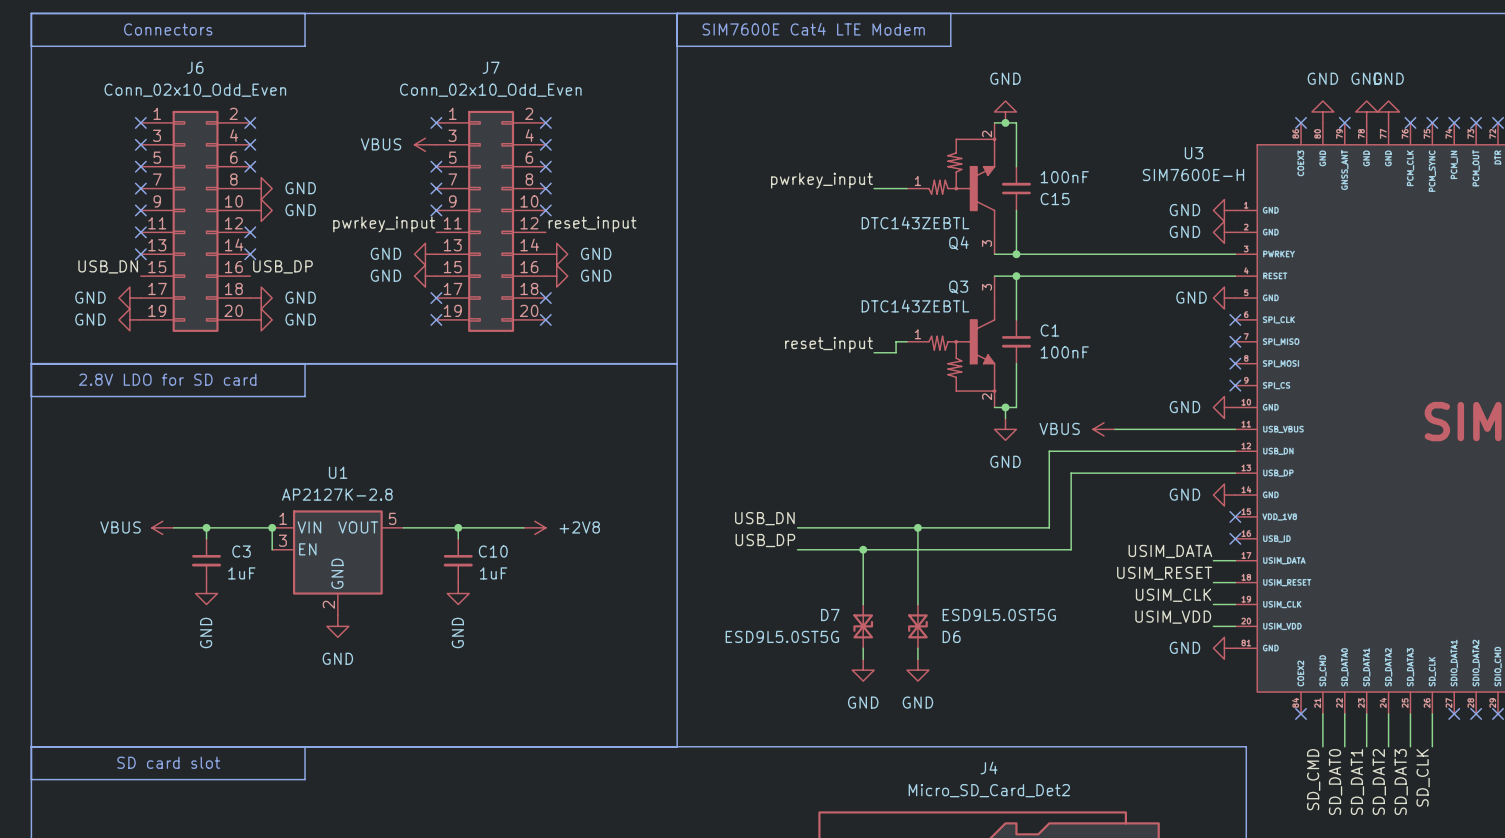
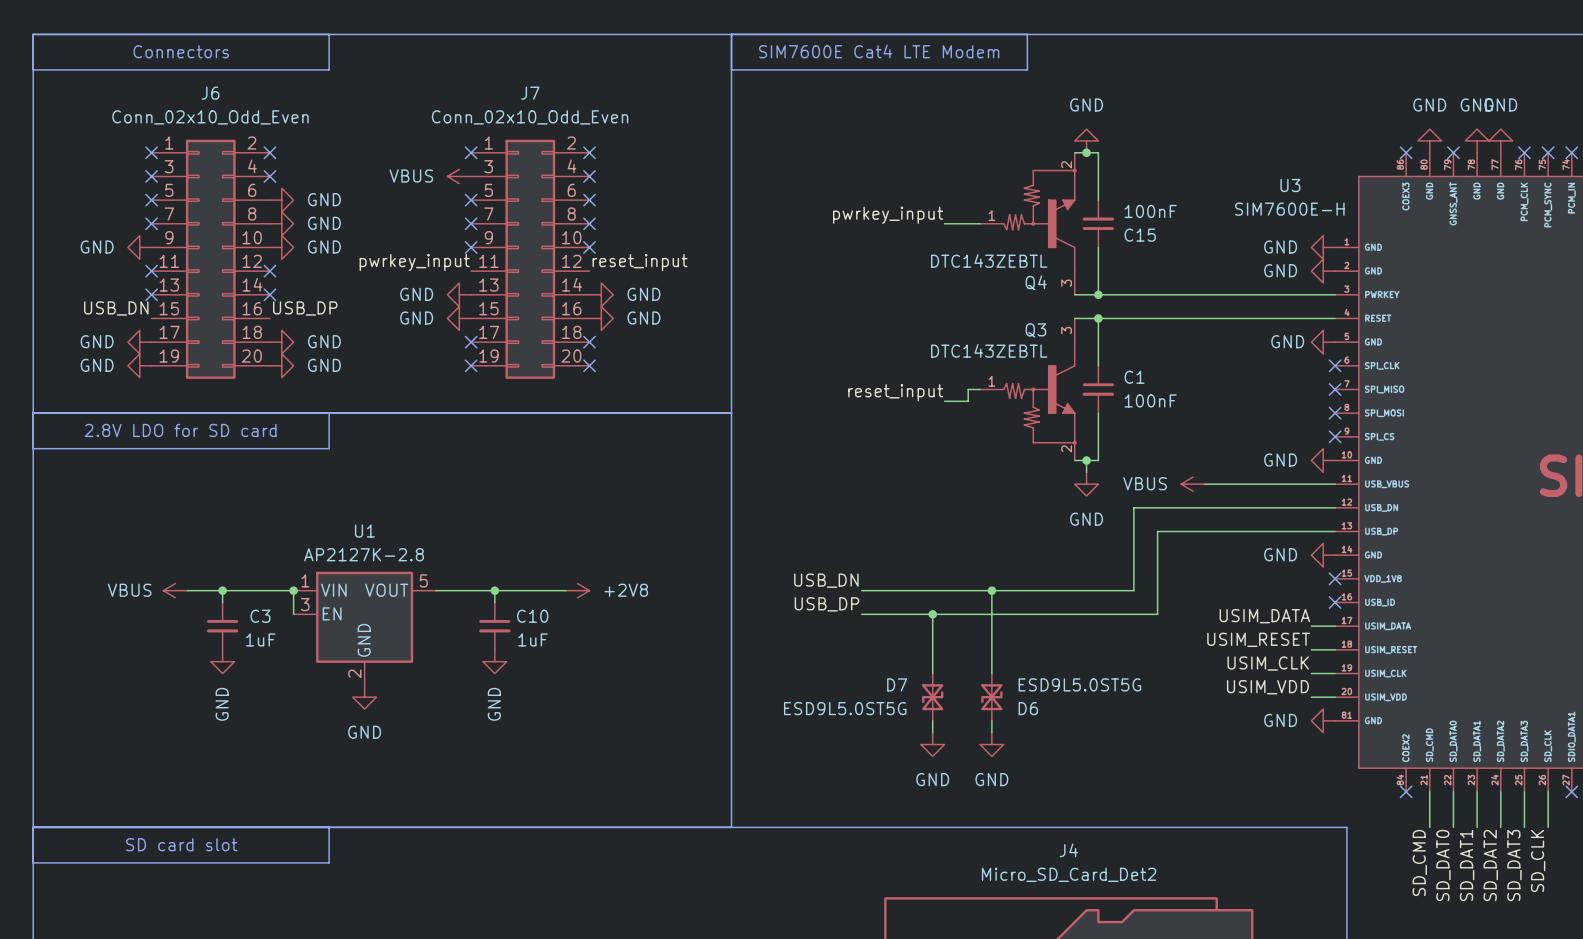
no-connect mark: (250, 166) -> none
power symbol: none -> GND (281, 200)
power symbol: none -> GND (139, 247)
no-connect mark: (140, 210) -> none

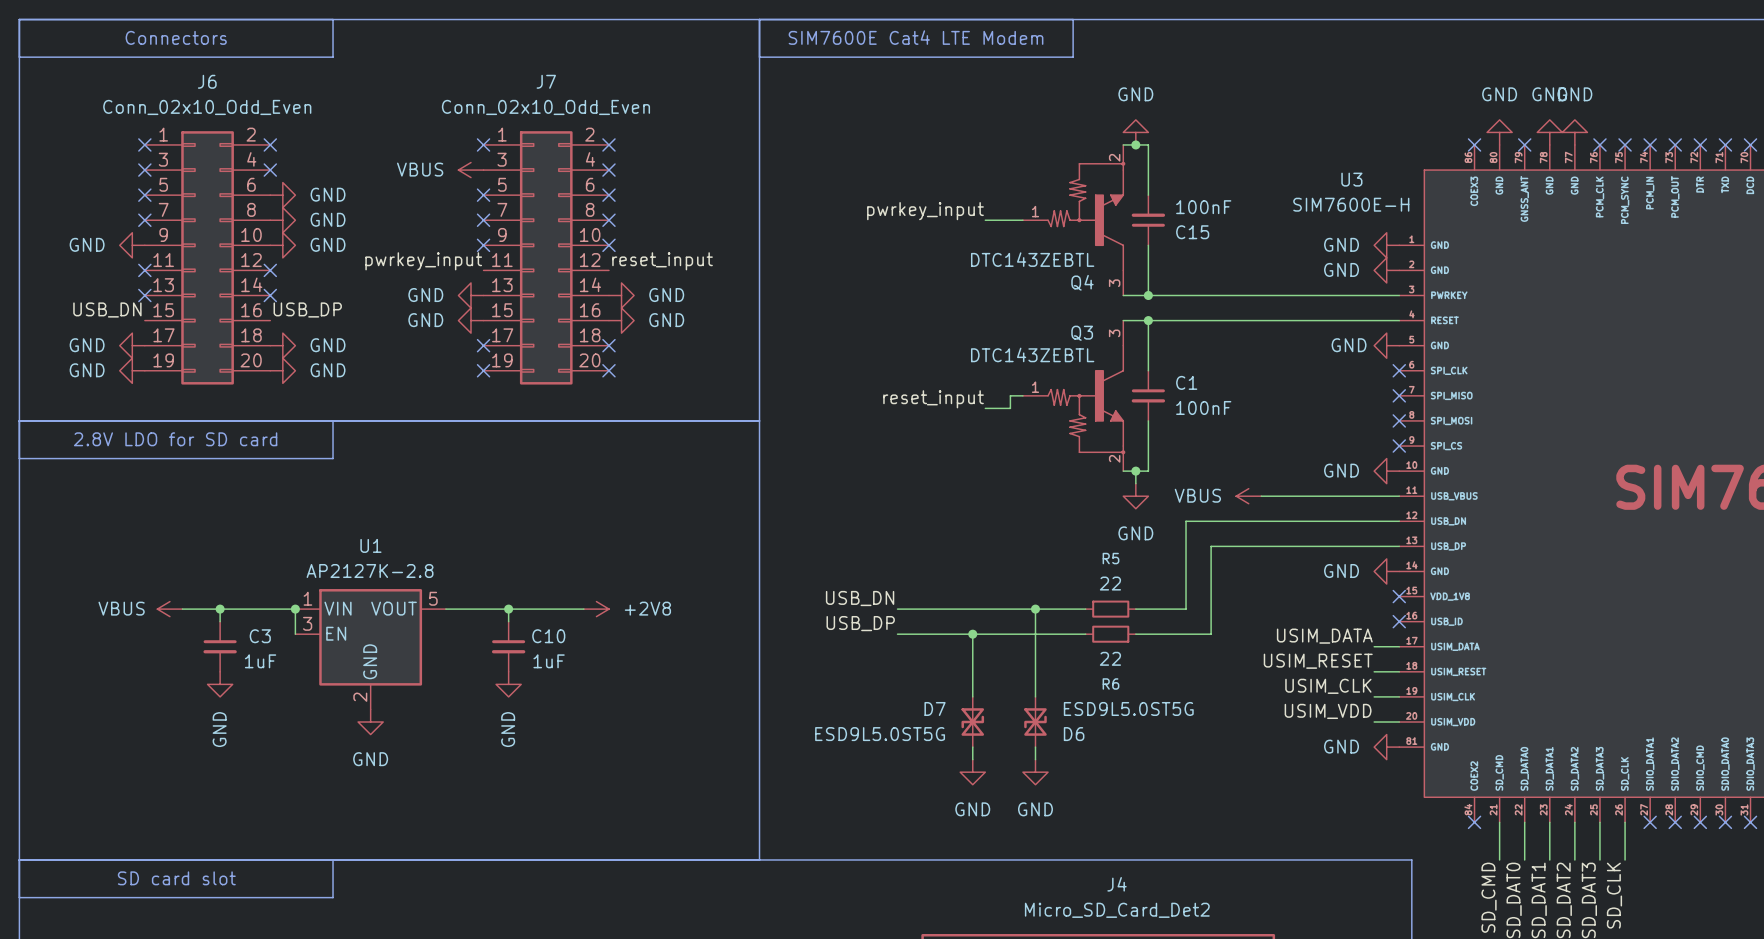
wire: (1039, 590) (1086, 590) -> none
R5: none -> 22 (1110, 609)
wire: (1039, 614) (1086, 614) -> none
R6: none -> 22 (1110, 634)

